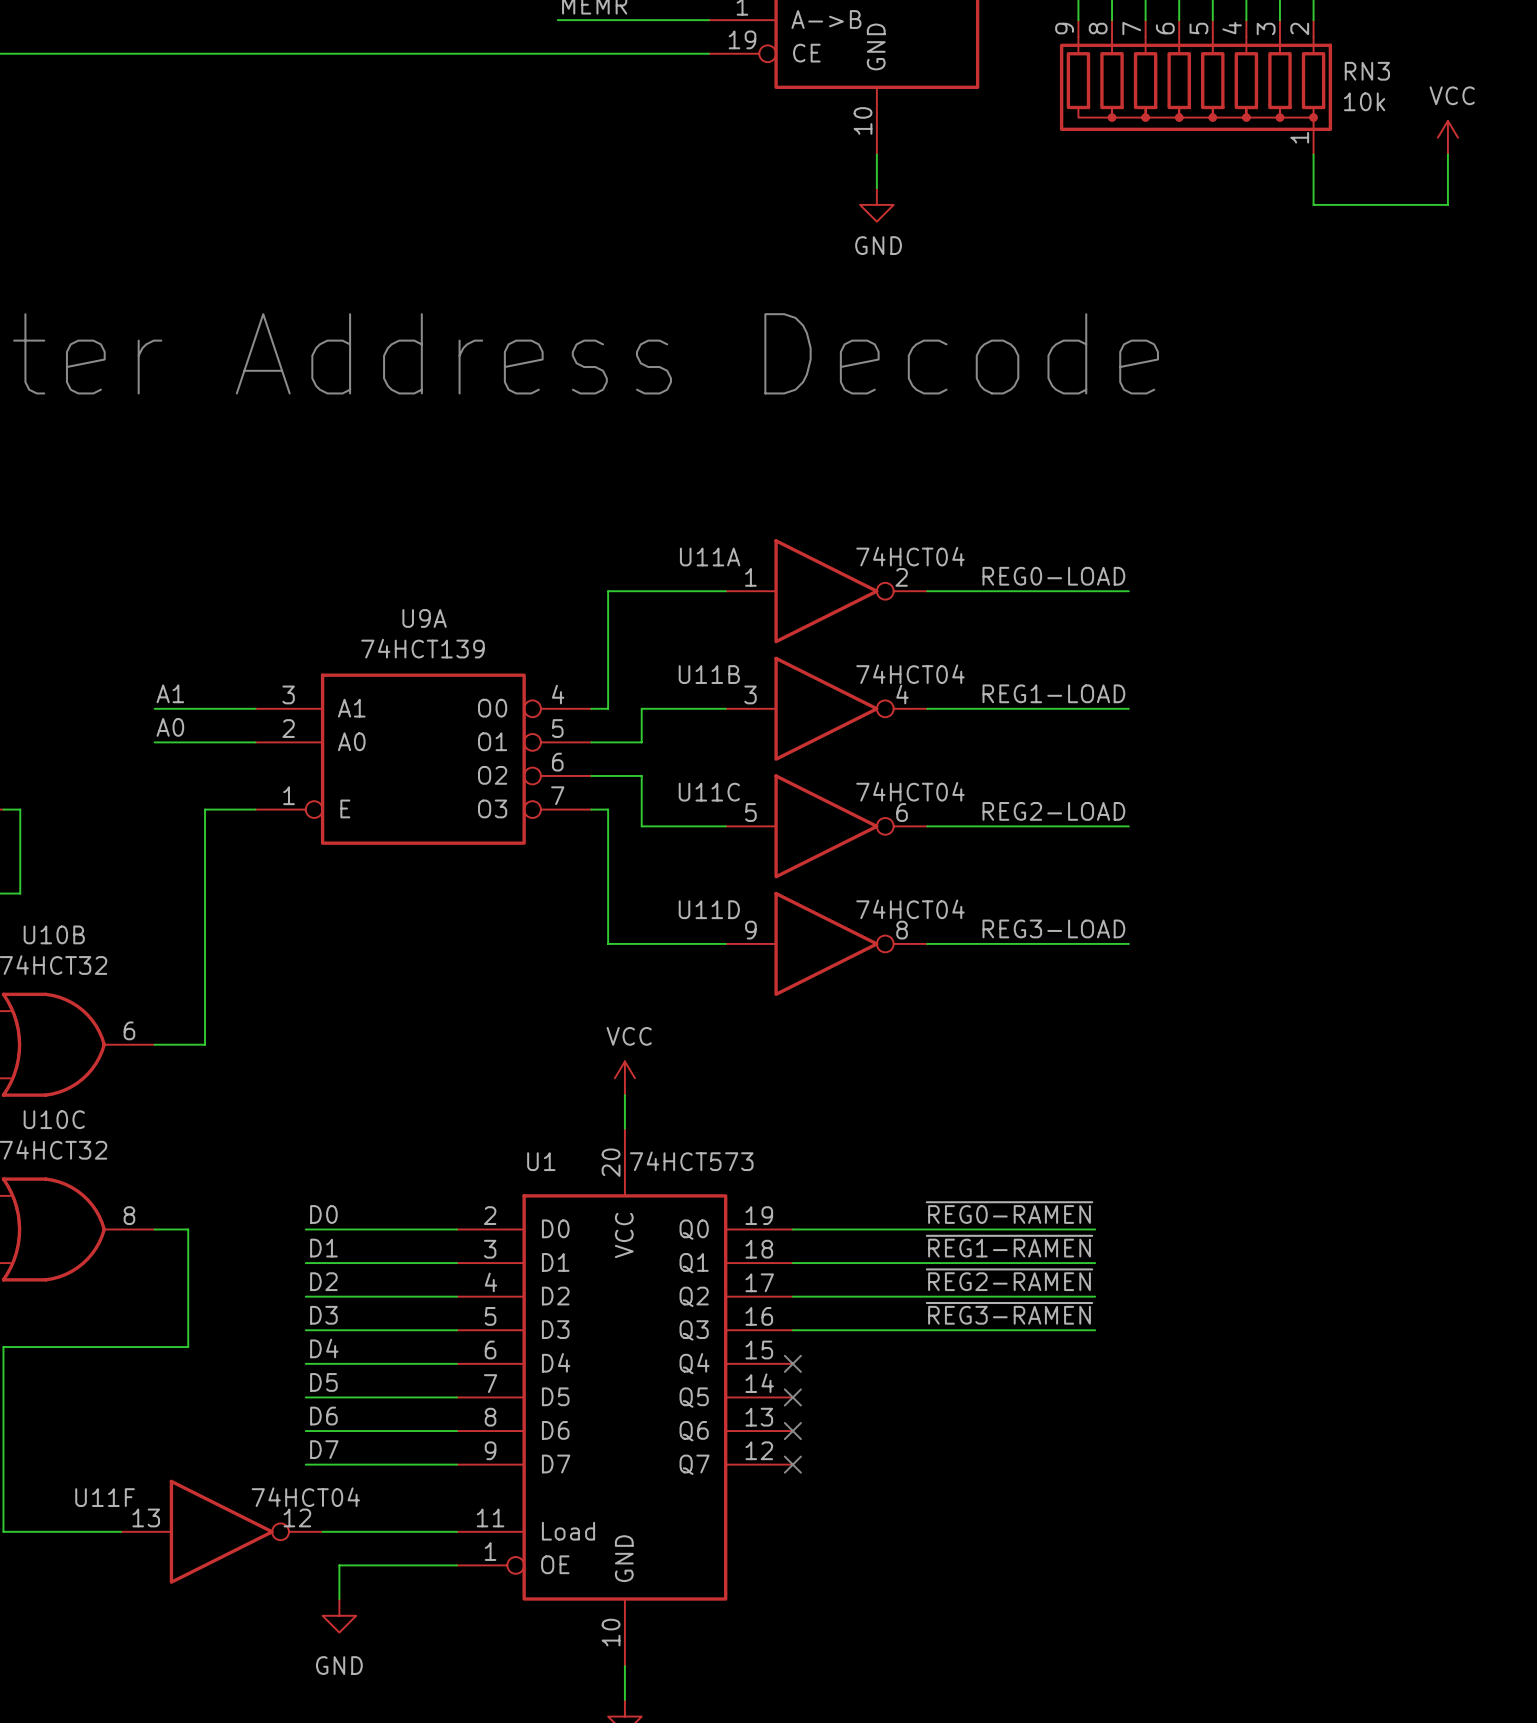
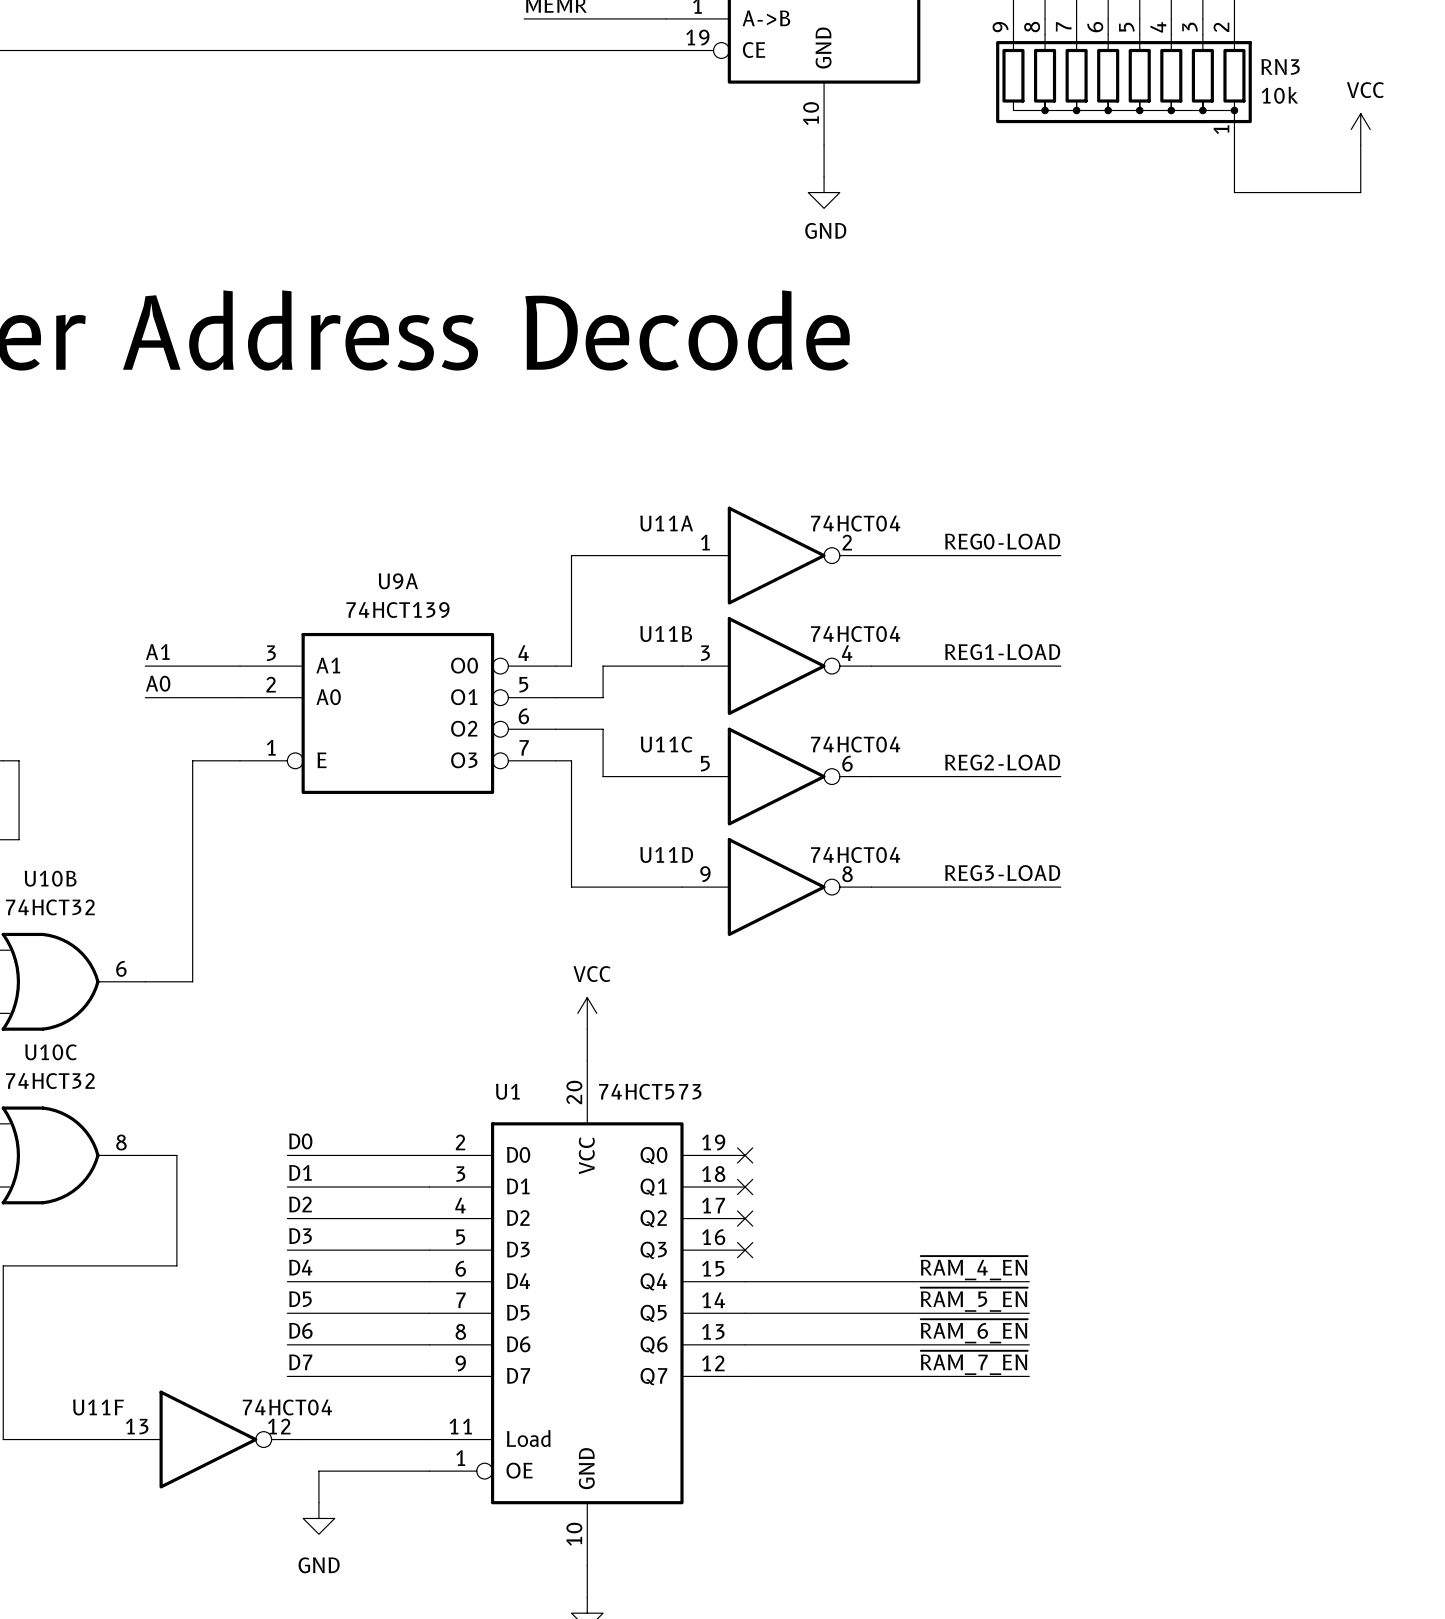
label: ~{REG0-RAMEN} (1009, 1212) -> none
wire: (792, 1229) (1095, 1229) -> (745, 1281) (1029, 1281)
no-connect mark: none -> (745, 1155)
label: ~{REG1-RAMEN} (1009, 1246) -> none
wire: (792, 1263) (1095, 1263) -> (745, 1313) (1029, 1313)
no-connect mark: none -> (745, 1186)
label: ~{REG2-RAMEN} (1009, 1279) -> none
wire: (792, 1296) (1095, 1296) -> (745, 1344) (1029, 1344)
no-connect mark: none -> (745, 1218)
label: ~{REG3-RAMEN} (1009, 1313) -> ~{RAM_4_EN} (974, 1268)
wire: (792, 1330) (1095, 1330) -> (745, 1376) (1029, 1376)
no-connect mark: none -> (745, 1250)
no-connect mark: (792, 1363) -> none
label: none -> ~{RAM_5_EN} (974, 1299)
no-connect mark: (792, 1397) -> none
label: none -> ~{RAM_6_EN} (974, 1331)
no-connect mark: (792, 1431) -> none
label: none -> ~{RAM_7_EN} (974, 1362)
no-connect mark: (792, 1464) -> none

